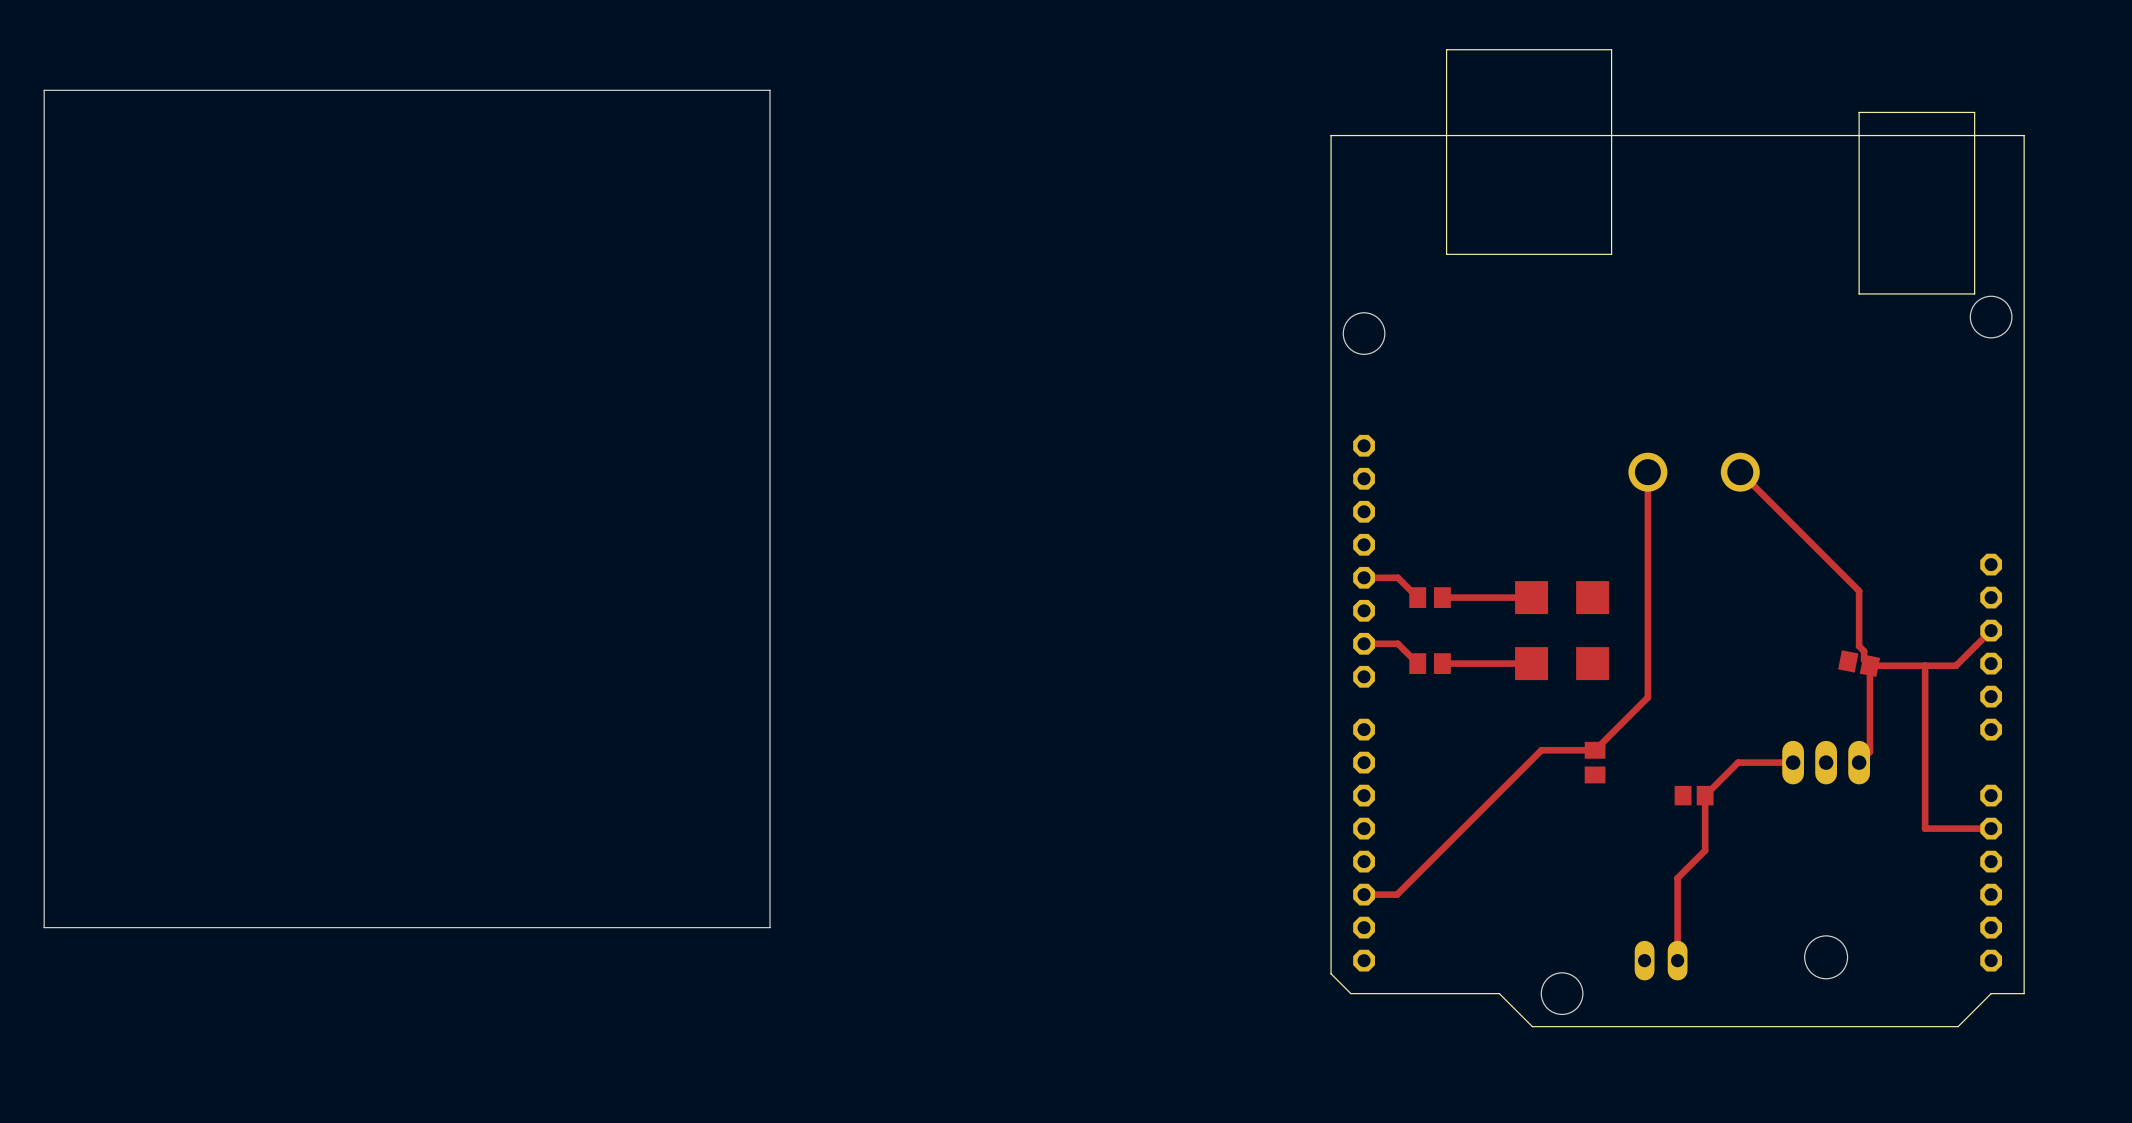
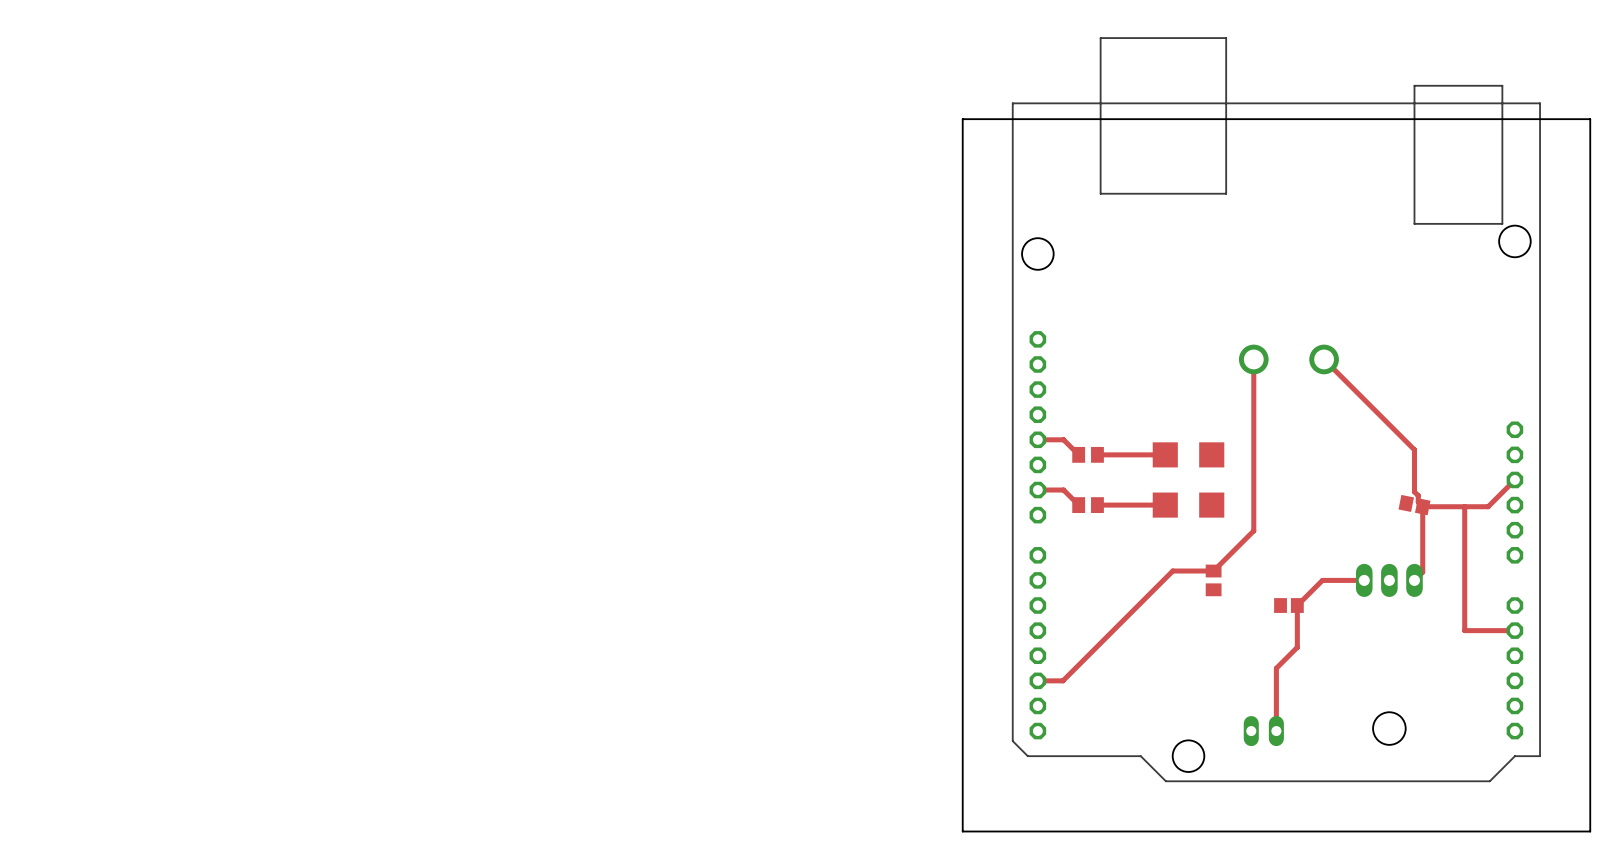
board edge: (770, 90) (44, 90) (44, 927) (770, 927) (770, 90) -> none
board edge: none -> (1590, 119) (962, 119) (962, 831) (1590, 831) (1590, 119)

